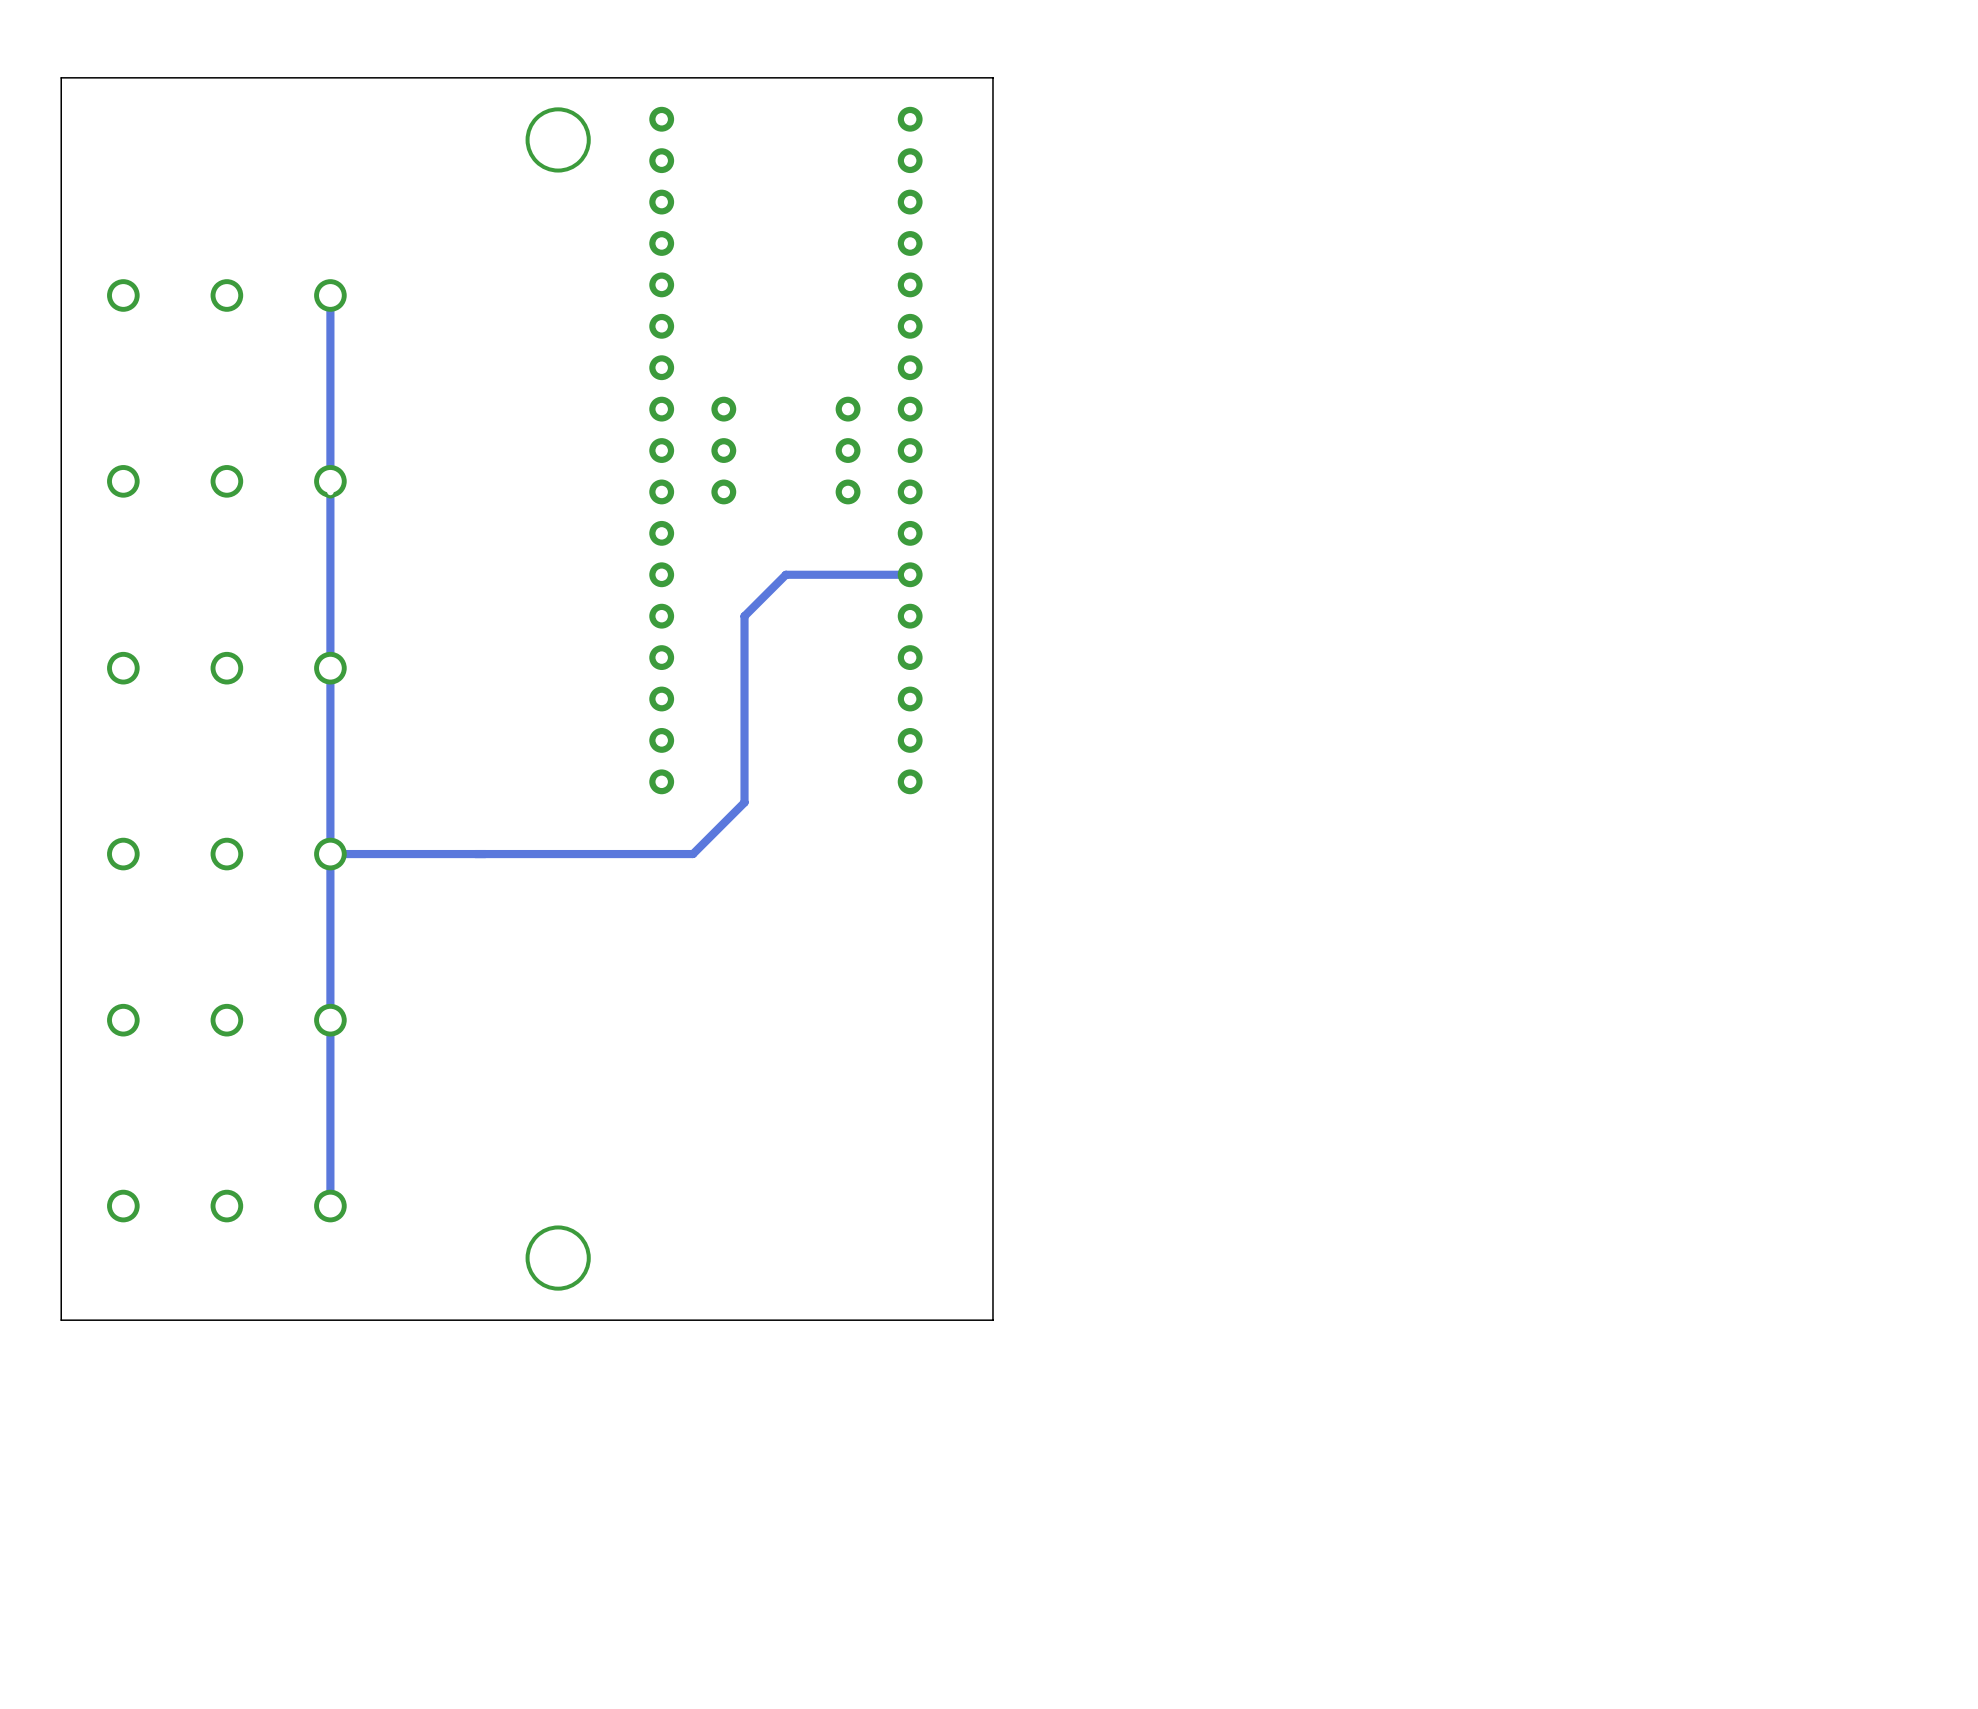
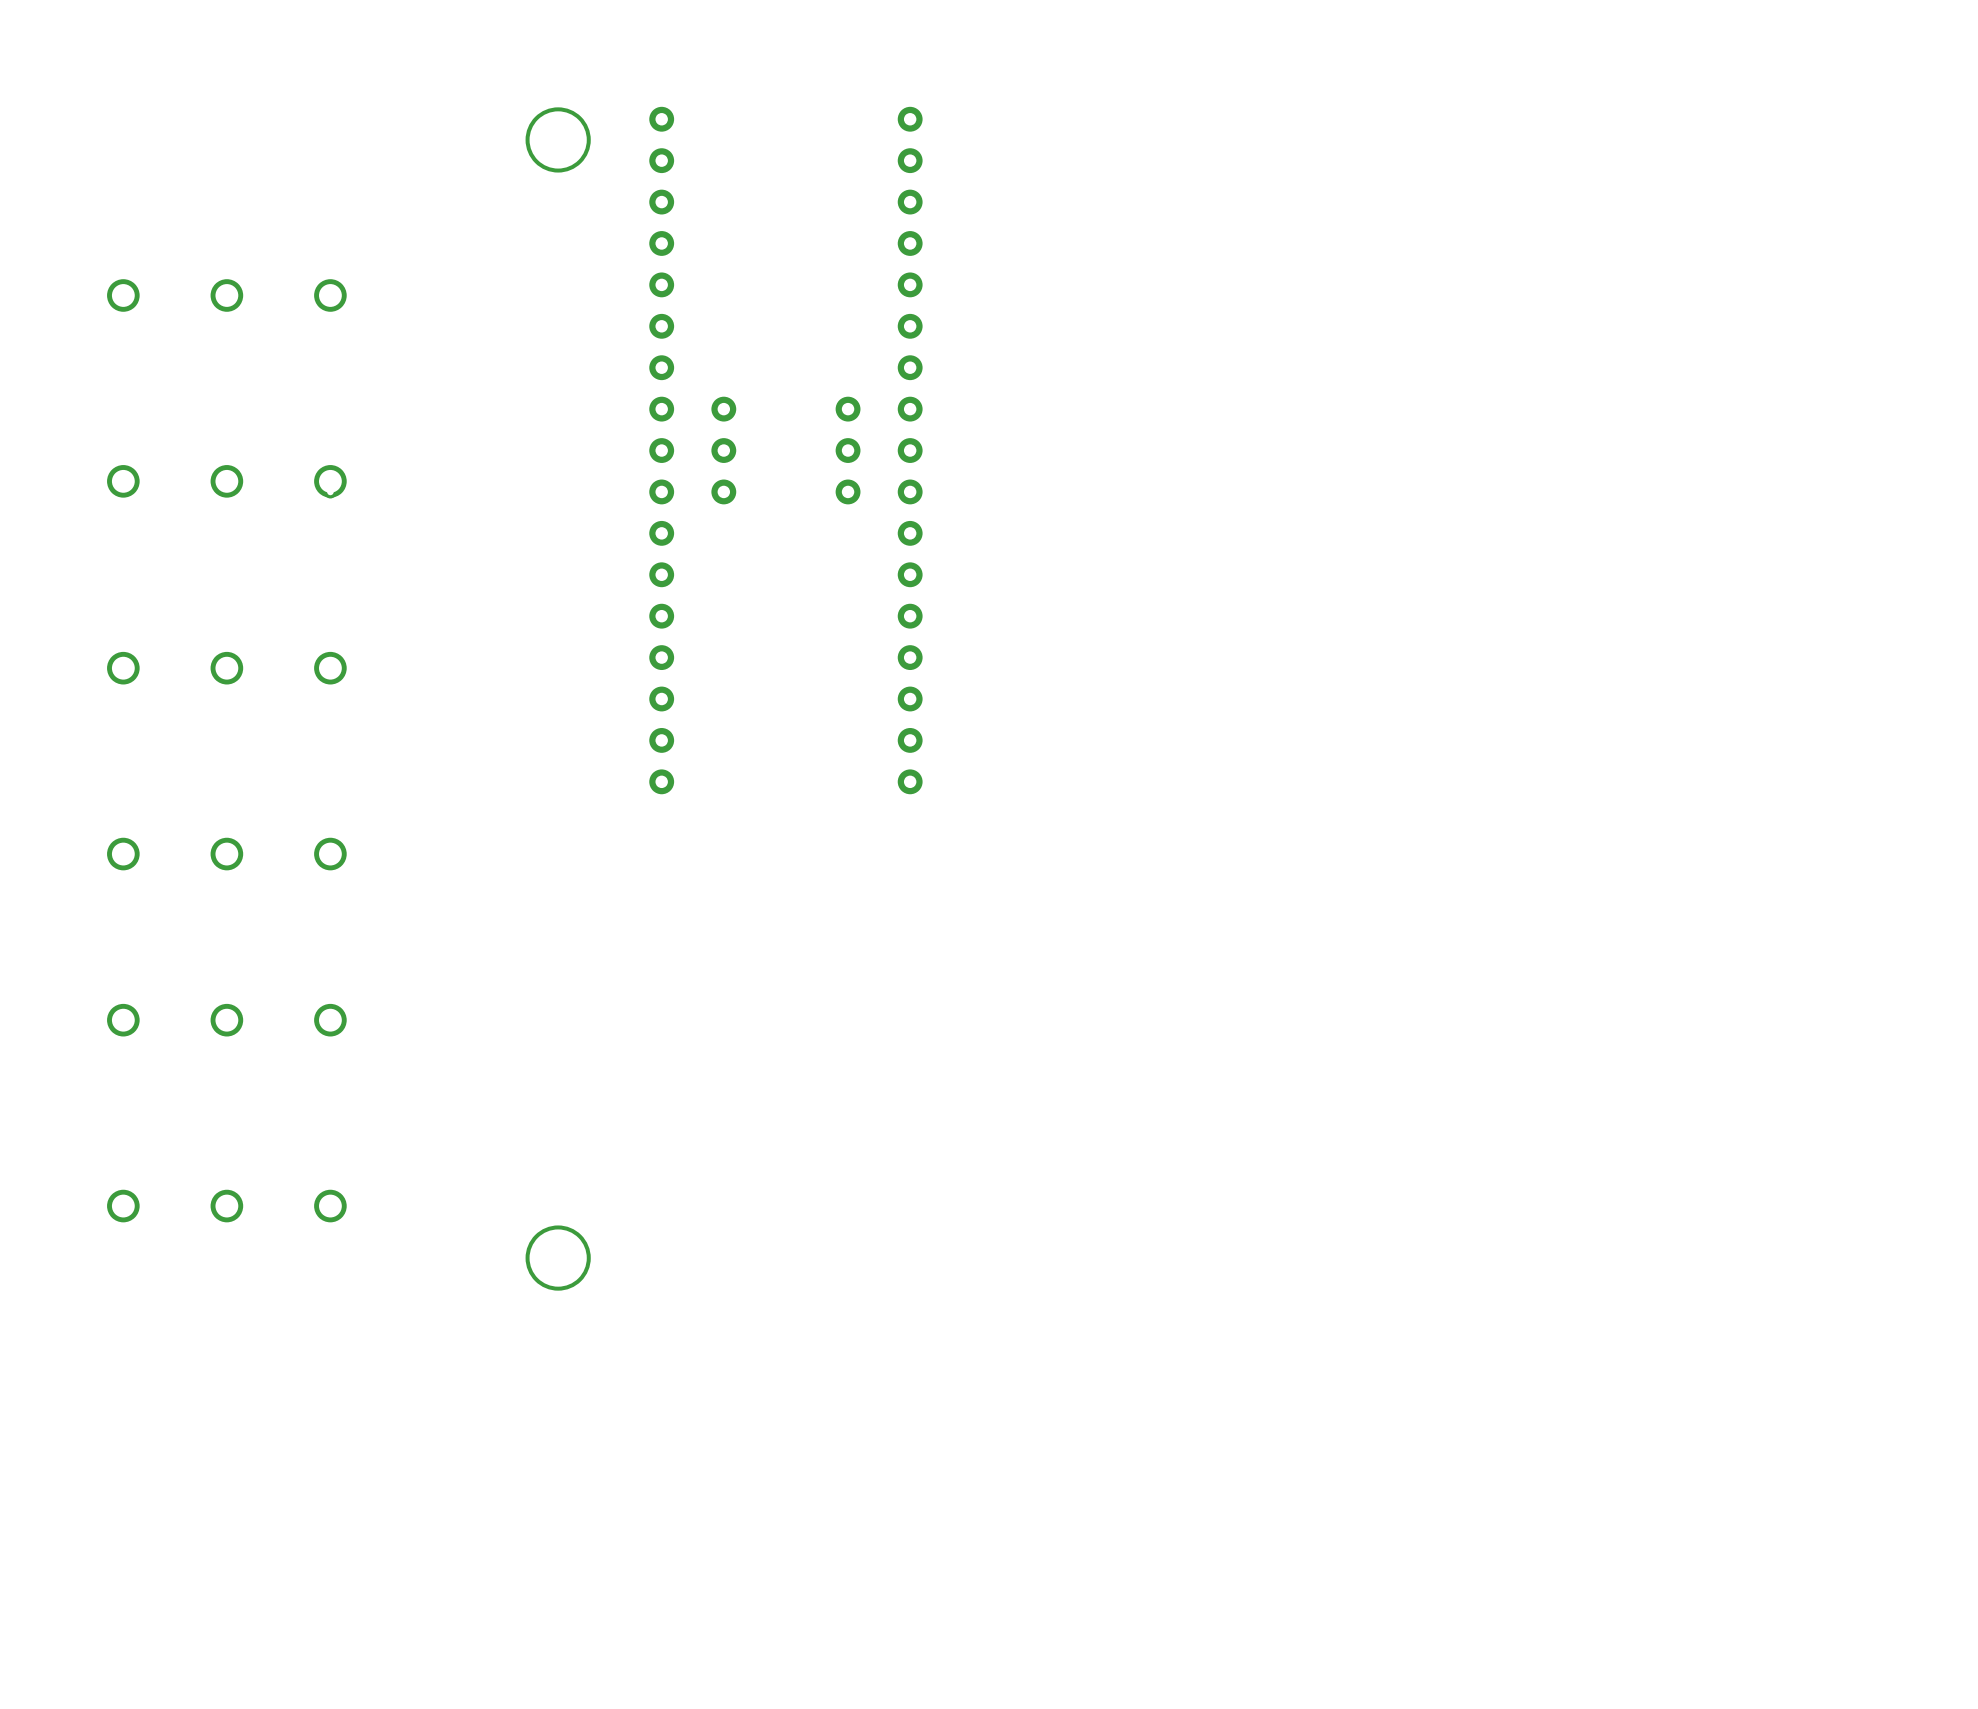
board edge: (992, 77) (992, 1320) (61, 1320) (61, 77) (992, 77) -> none
track: (330, 295) (330, 1206) -> none
track: (910, 574) (785, 574) (744, 616) (744, 802) (693, 854) (330, 854) -> none

